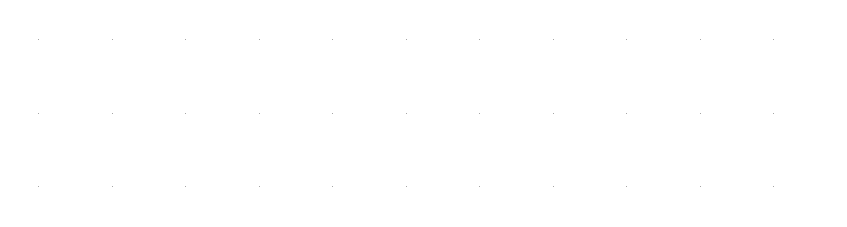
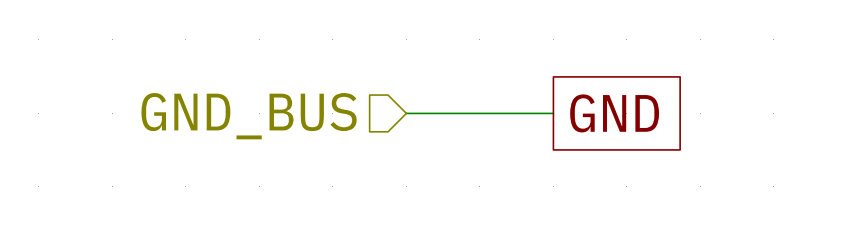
wire: none -> (406, 113) (553, 113)
global label: none -> GND (614, 113)
hierarchical label: none -> GND_BUS (249, 116)

